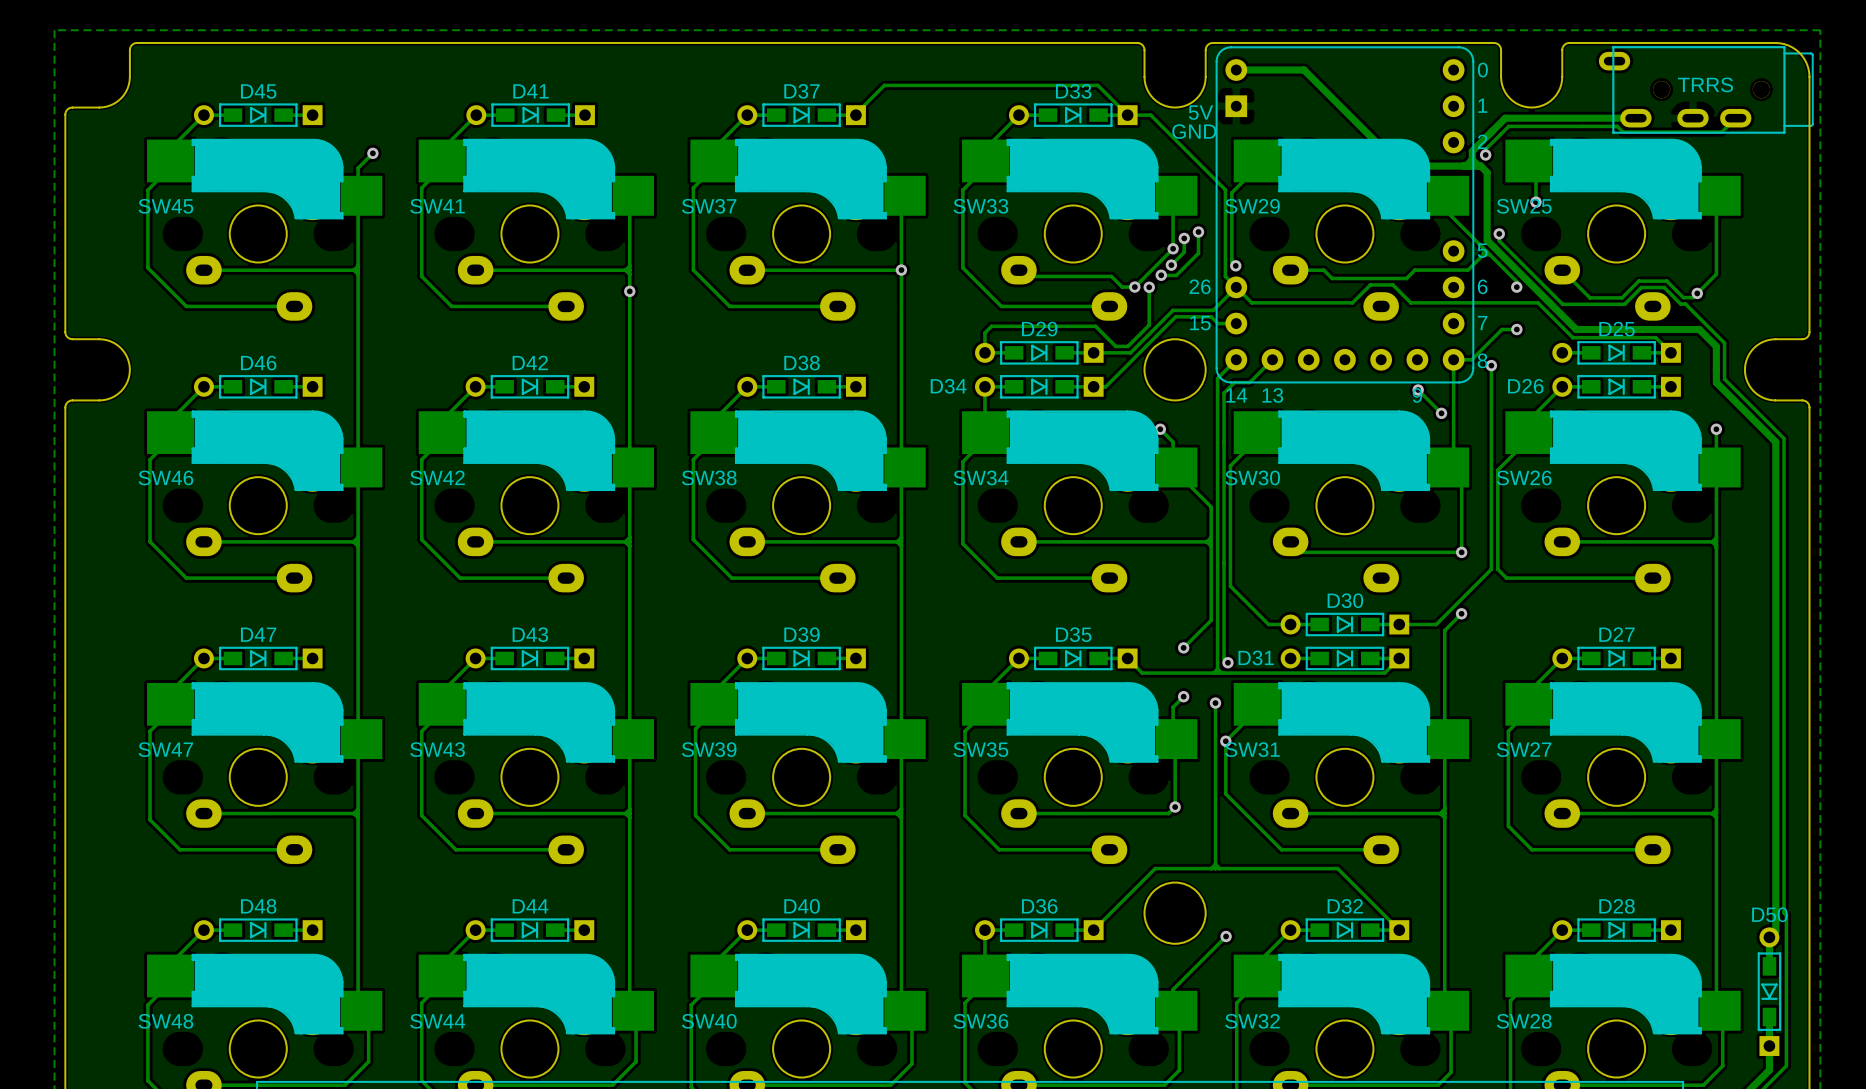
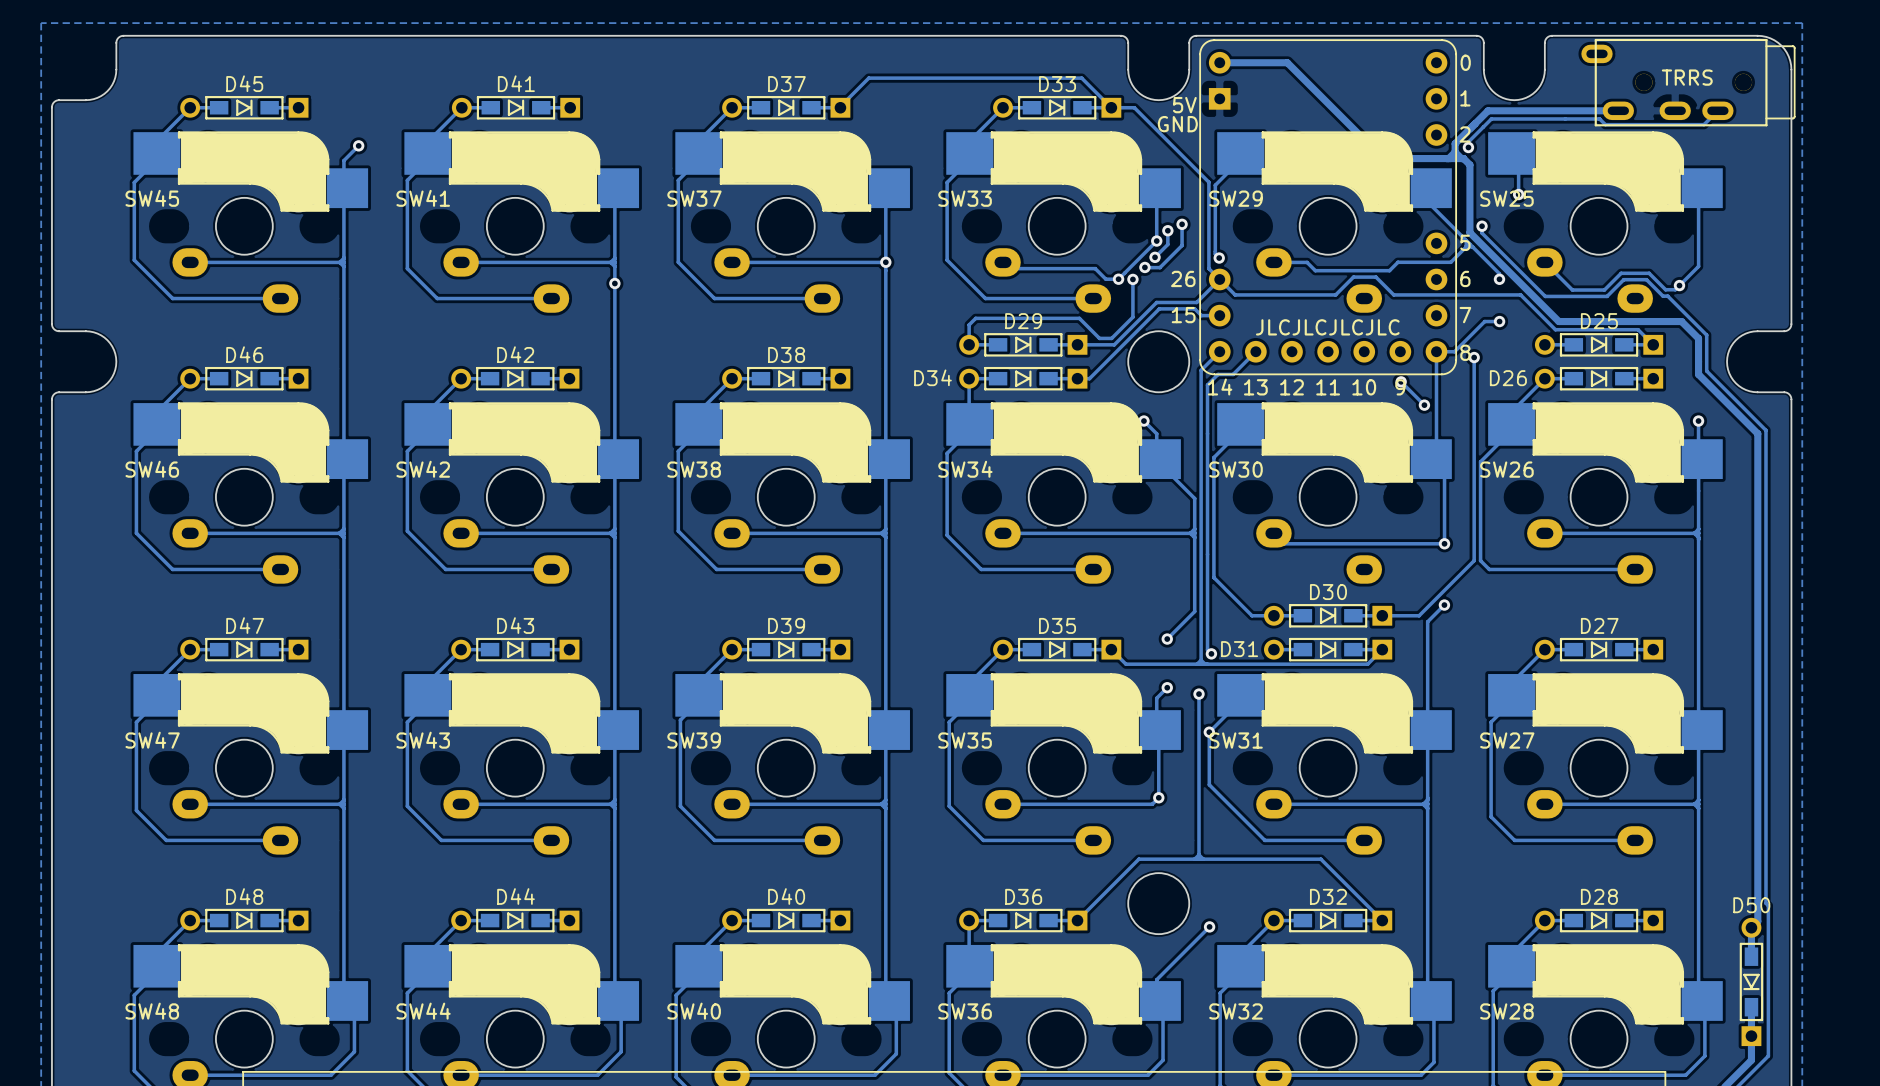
text: none -> JLCJLCJLCJLC (1327, 327)
part text: none -> 12 (1291, 387)
part text: none -> 11 (1328, 387)
part text: none -> 10 (1364, 387)

